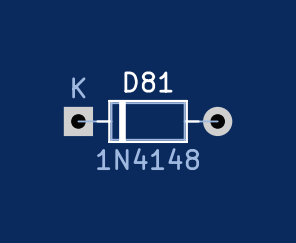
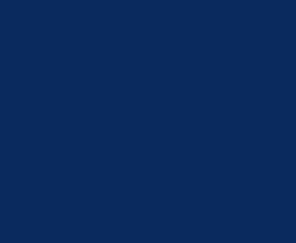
D81: 1N4148 (148, 121) -> none

